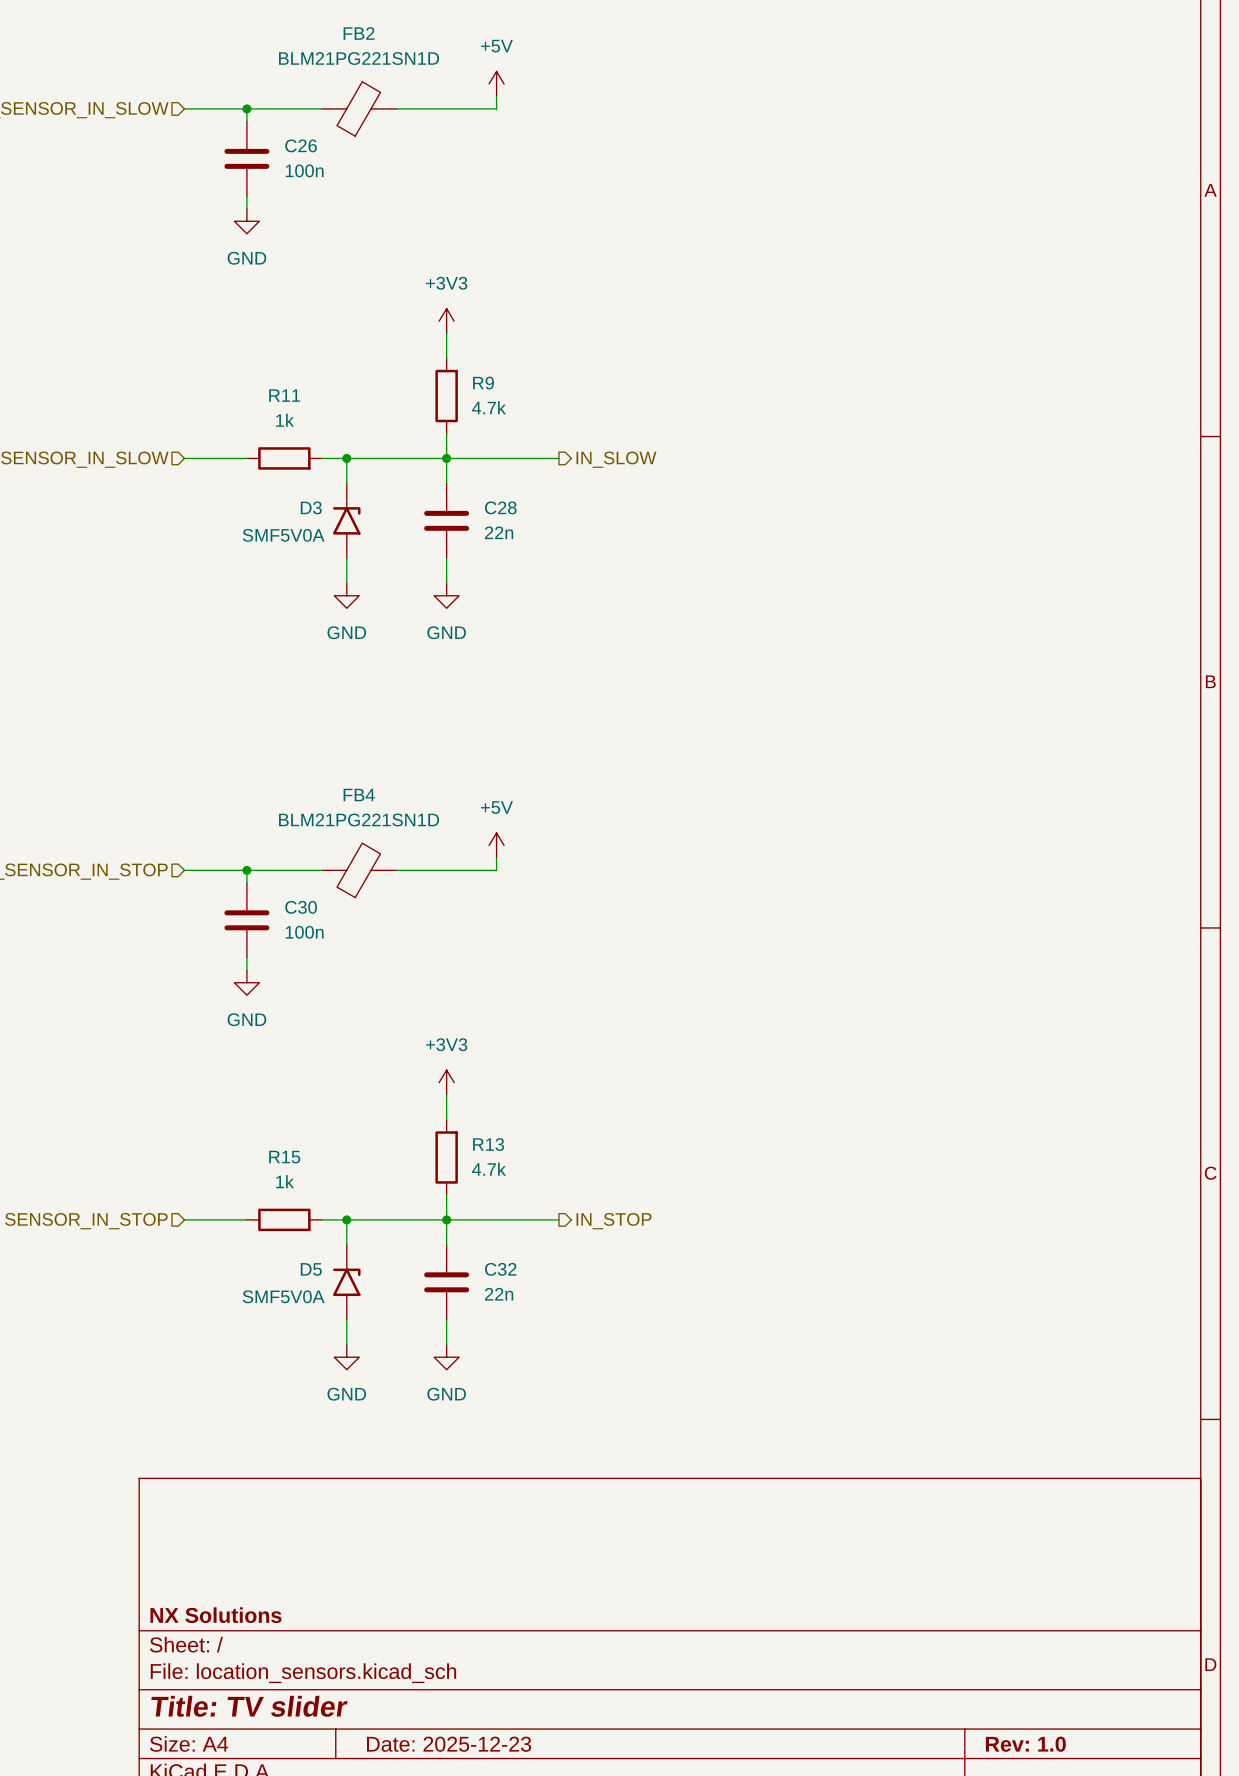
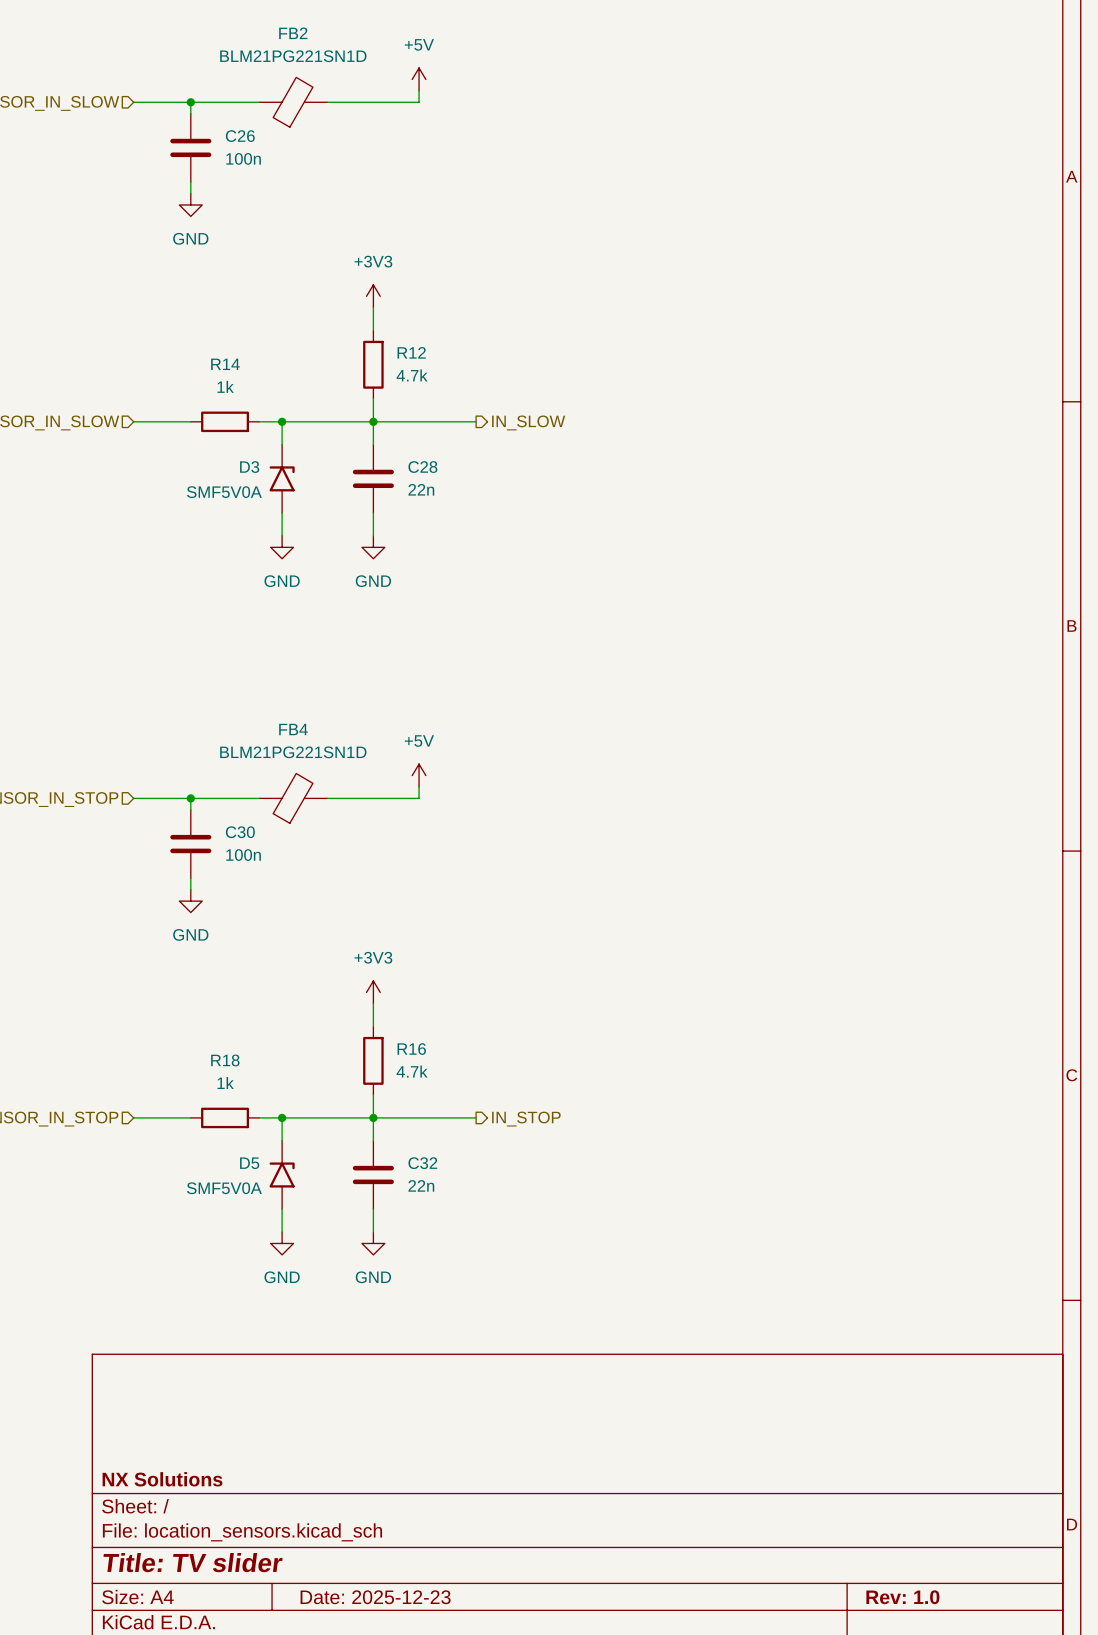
R9 name: R9 (483, 383) -> R12 (411, 352)
R11 name: R11 (284, 395) -> R14 (225, 364)
R13 name: R13 (488, 1144) -> R16 (411, 1049)
R15 name: R15 (284, 1157) -> R18 (225, 1060)

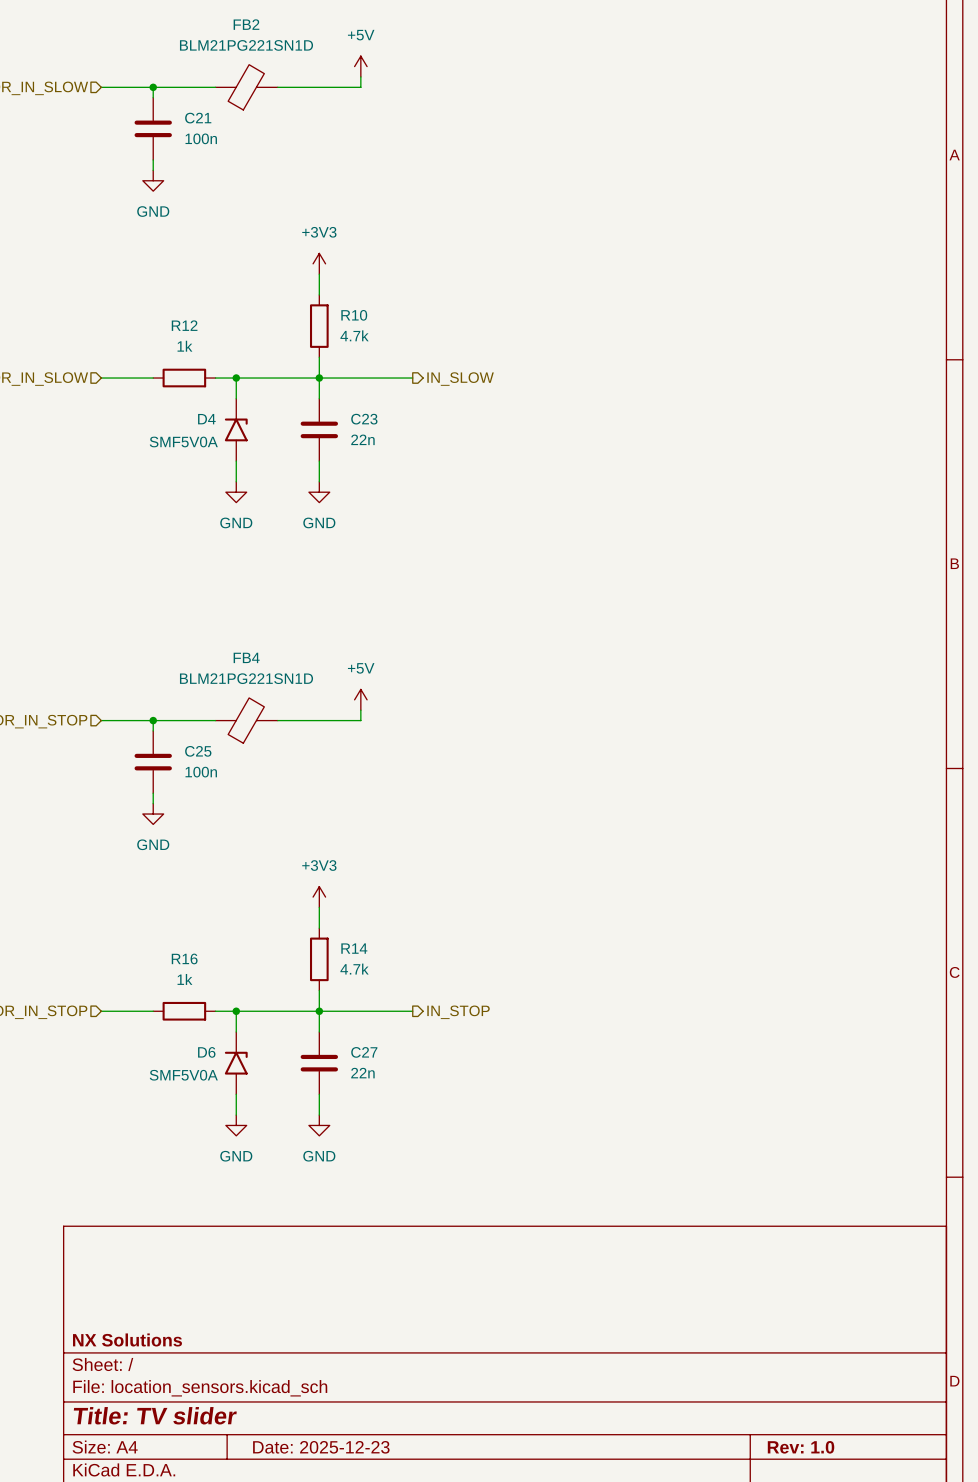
C26 name: C26 (240, 136) -> C21 (198, 118)
R12 name: R12 (411, 352) -> R10 (354, 315)
R14 name: R14 (225, 364) -> R12 (184, 325)
D3 name: D3 (249, 467) -> D4 (206, 419)
C28 name: C28 (422, 467) -> C23 (364, 419)
C30 name: C30 (240, 832) -> C25 (198, 751)
R16 name: R16 (411, 1049) -> R14 (354, 948)
R18 name: R18 (225, 1060) -> R16 (184, 958)
D5 name: D5 (249, 1163) -> D6 (206, 1052)
C32 name: C32 (422, 1163) -> C27 (364, 1052)

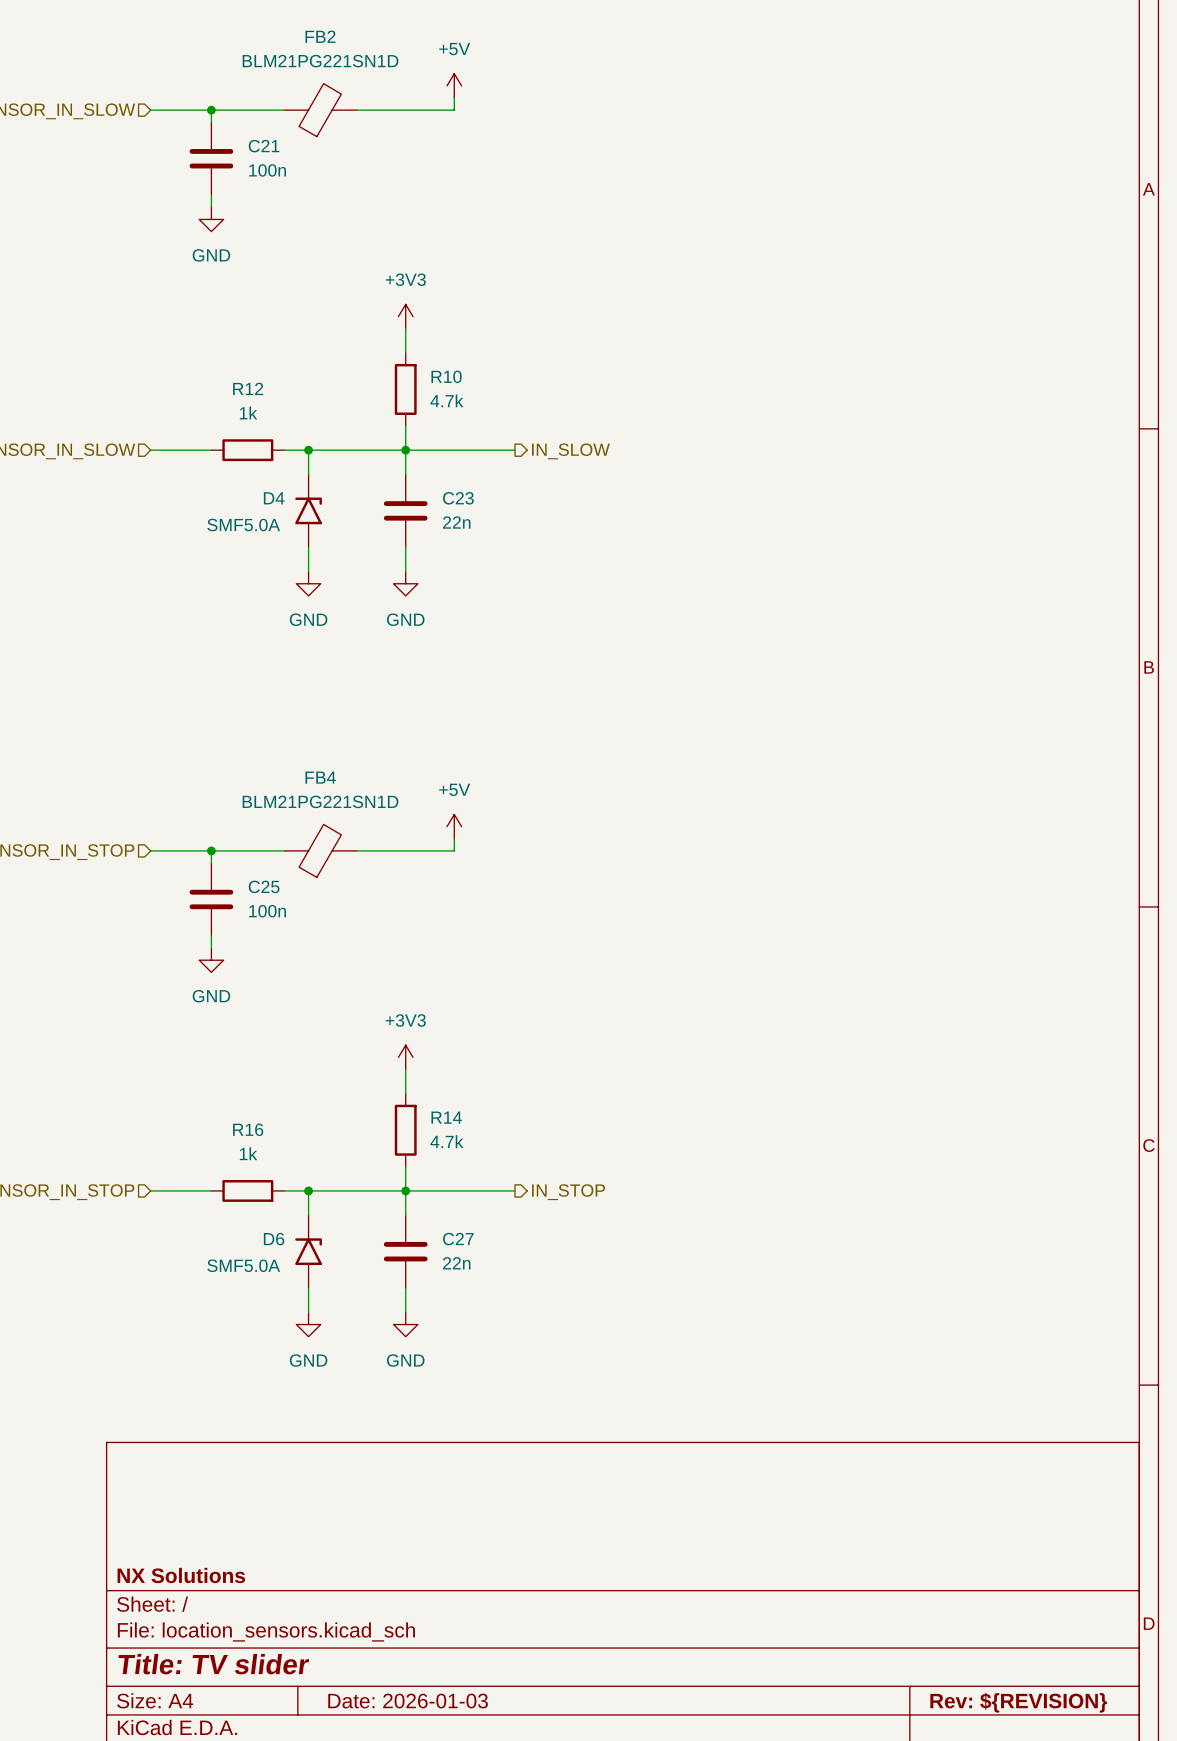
D4 value: SMF5V0A (183, 441) -> SMF5.0A (243, 525)
D6 value: SMF5V0A (183, 1075) -> SMF5.0A (243, 1265)
title block: Date: 2025-12-23 (321, 1447) -> Date: 2026-01-03 (408, 1701)
title block: Rev: 1.0 (801, 1447) -> Rev: ${REVISION} (1018, 1702)

